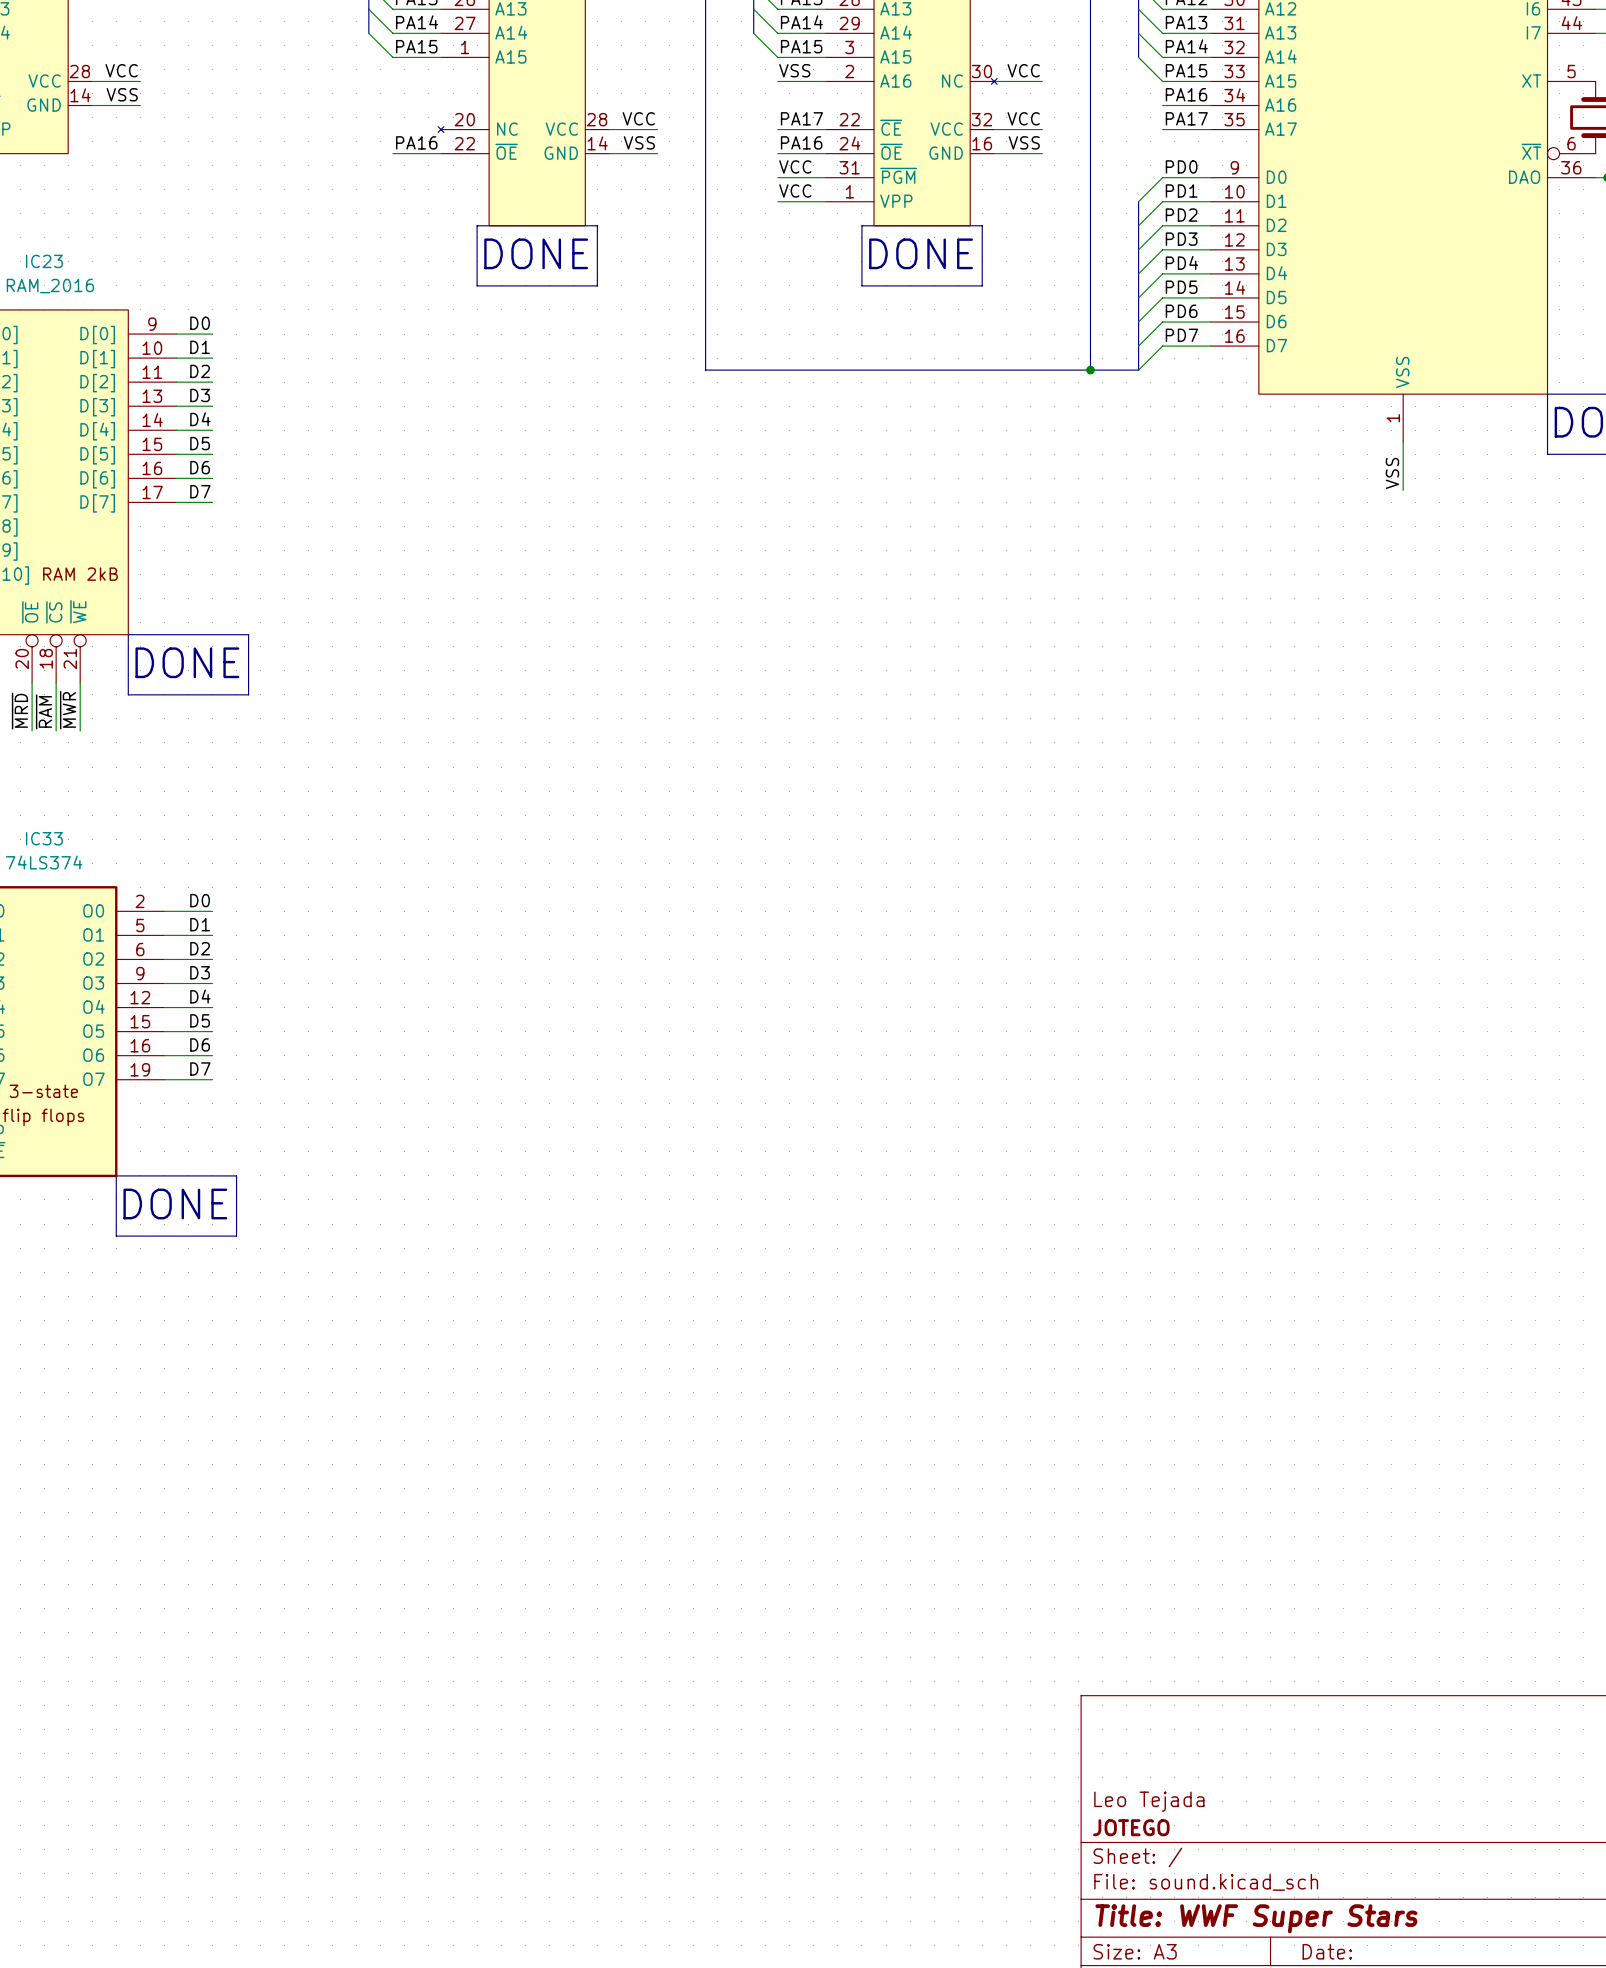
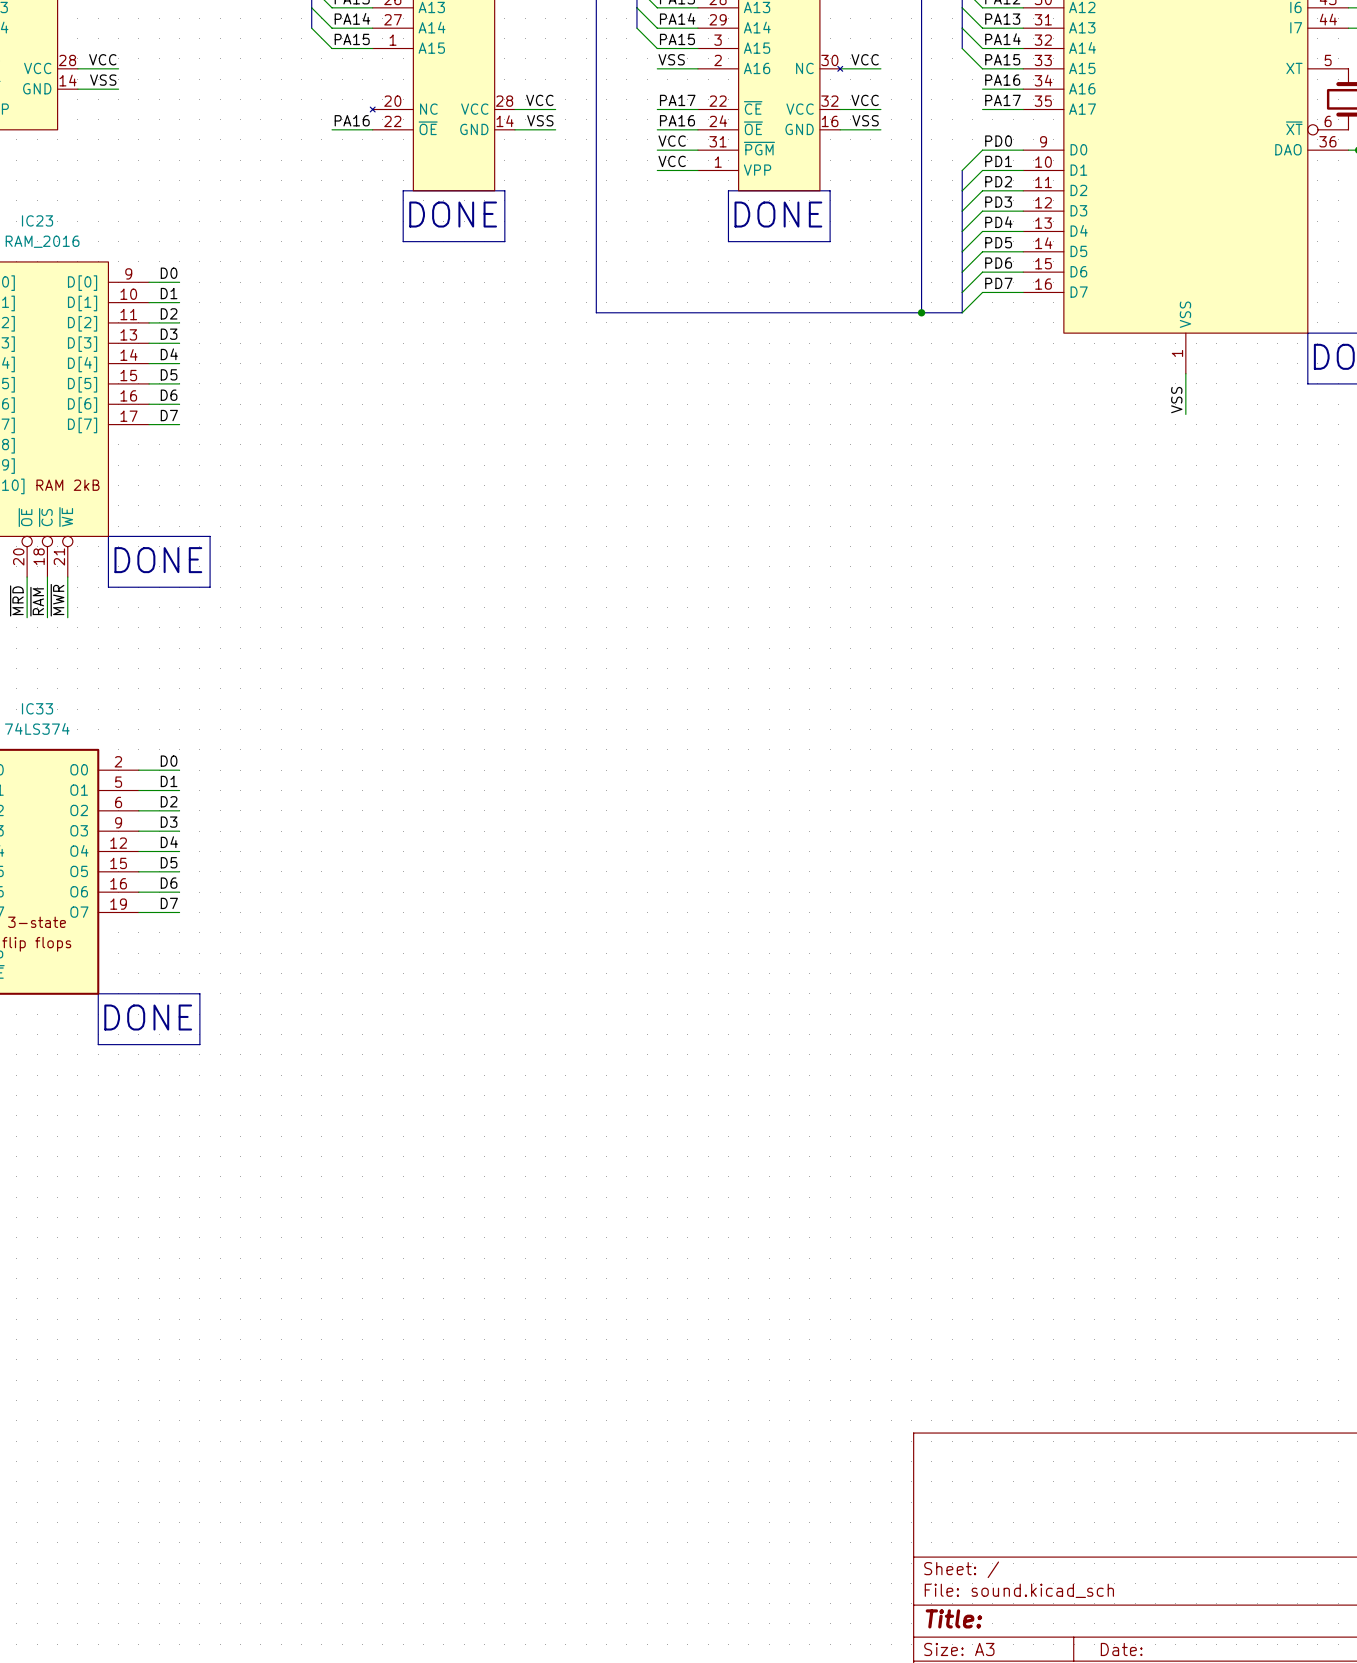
title block: Leo Tejada (1149, 1801) -> none
title block: JOTEGO (1131, 1827) -> none
title block: Title: WWF Super Stars (1256, 1918) -> Title: (953, 1618)

